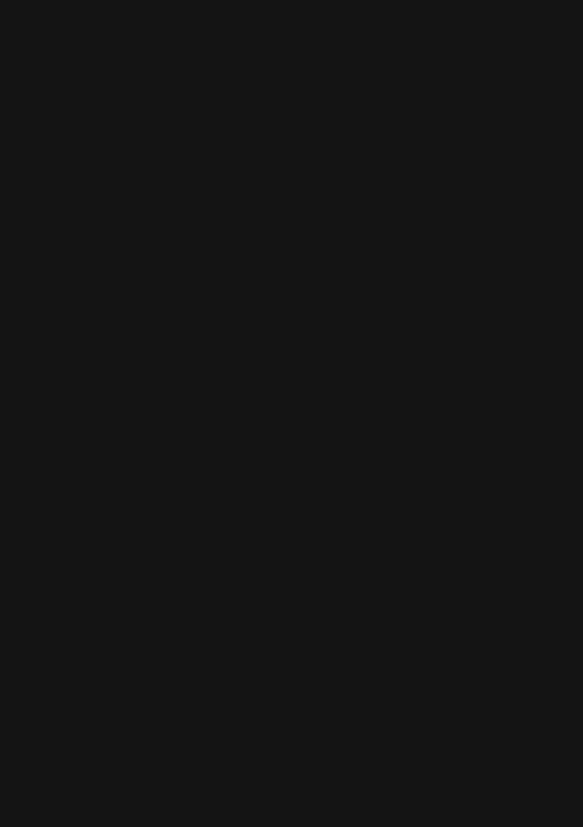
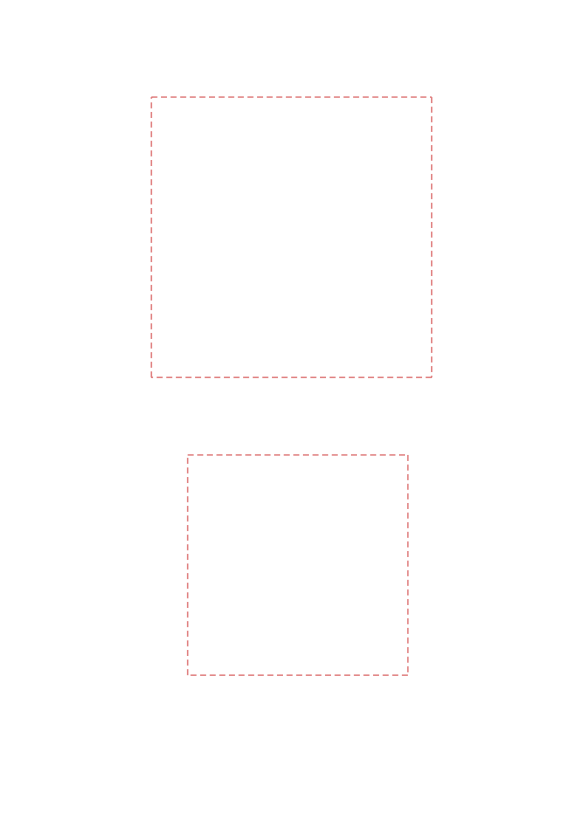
zone outline: none -> (151, 97) (151, 377) (431, 377) (431, 97) (151, 97)
zone outline: none -> (187, 454) (187, 675) (407, 675) (407, 454) (187, 454)

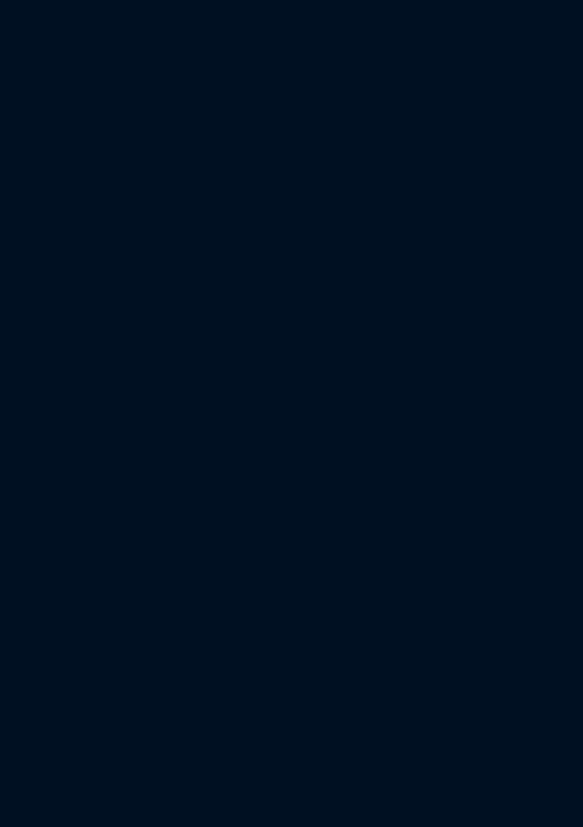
zone outline: (151, 97) (151, 377) (431, 377) (431, 97) (151, 97) -> none
zone outline: (187, 454) (187, 675) (407, 675) (407, 454) (187, 454) -> none

